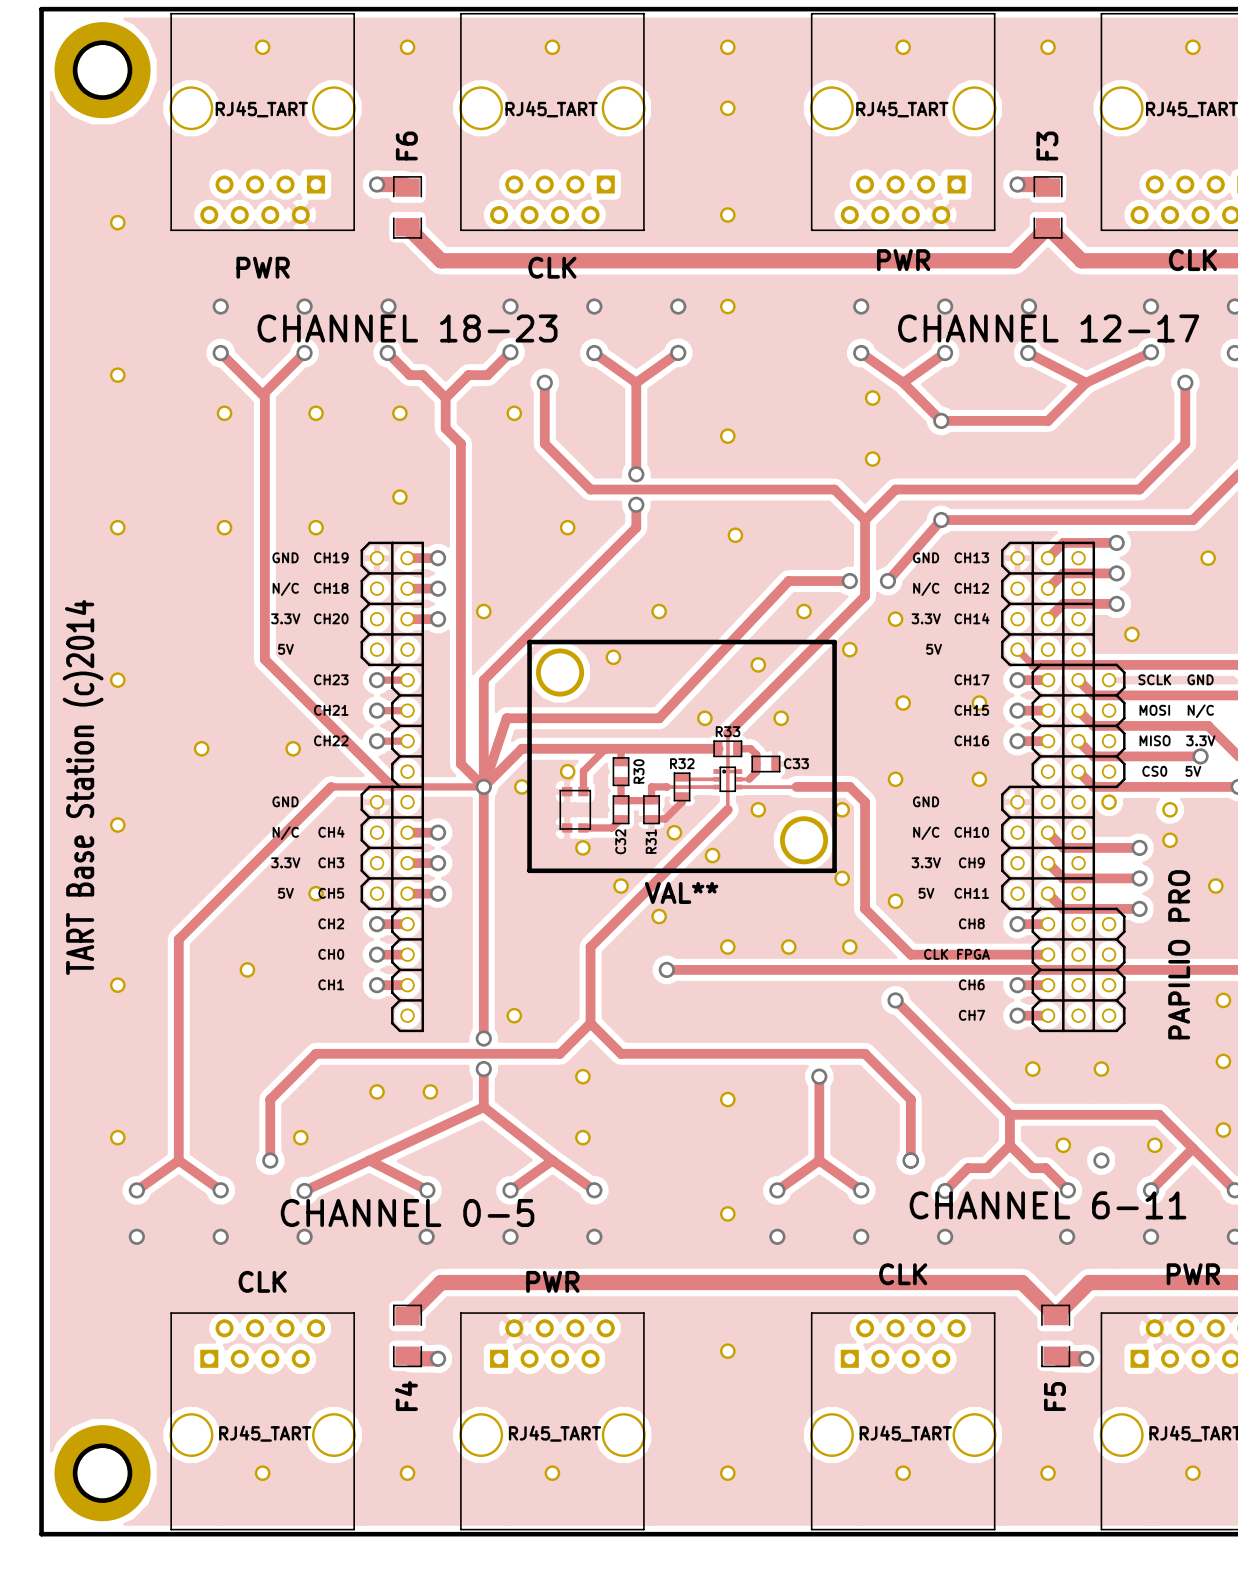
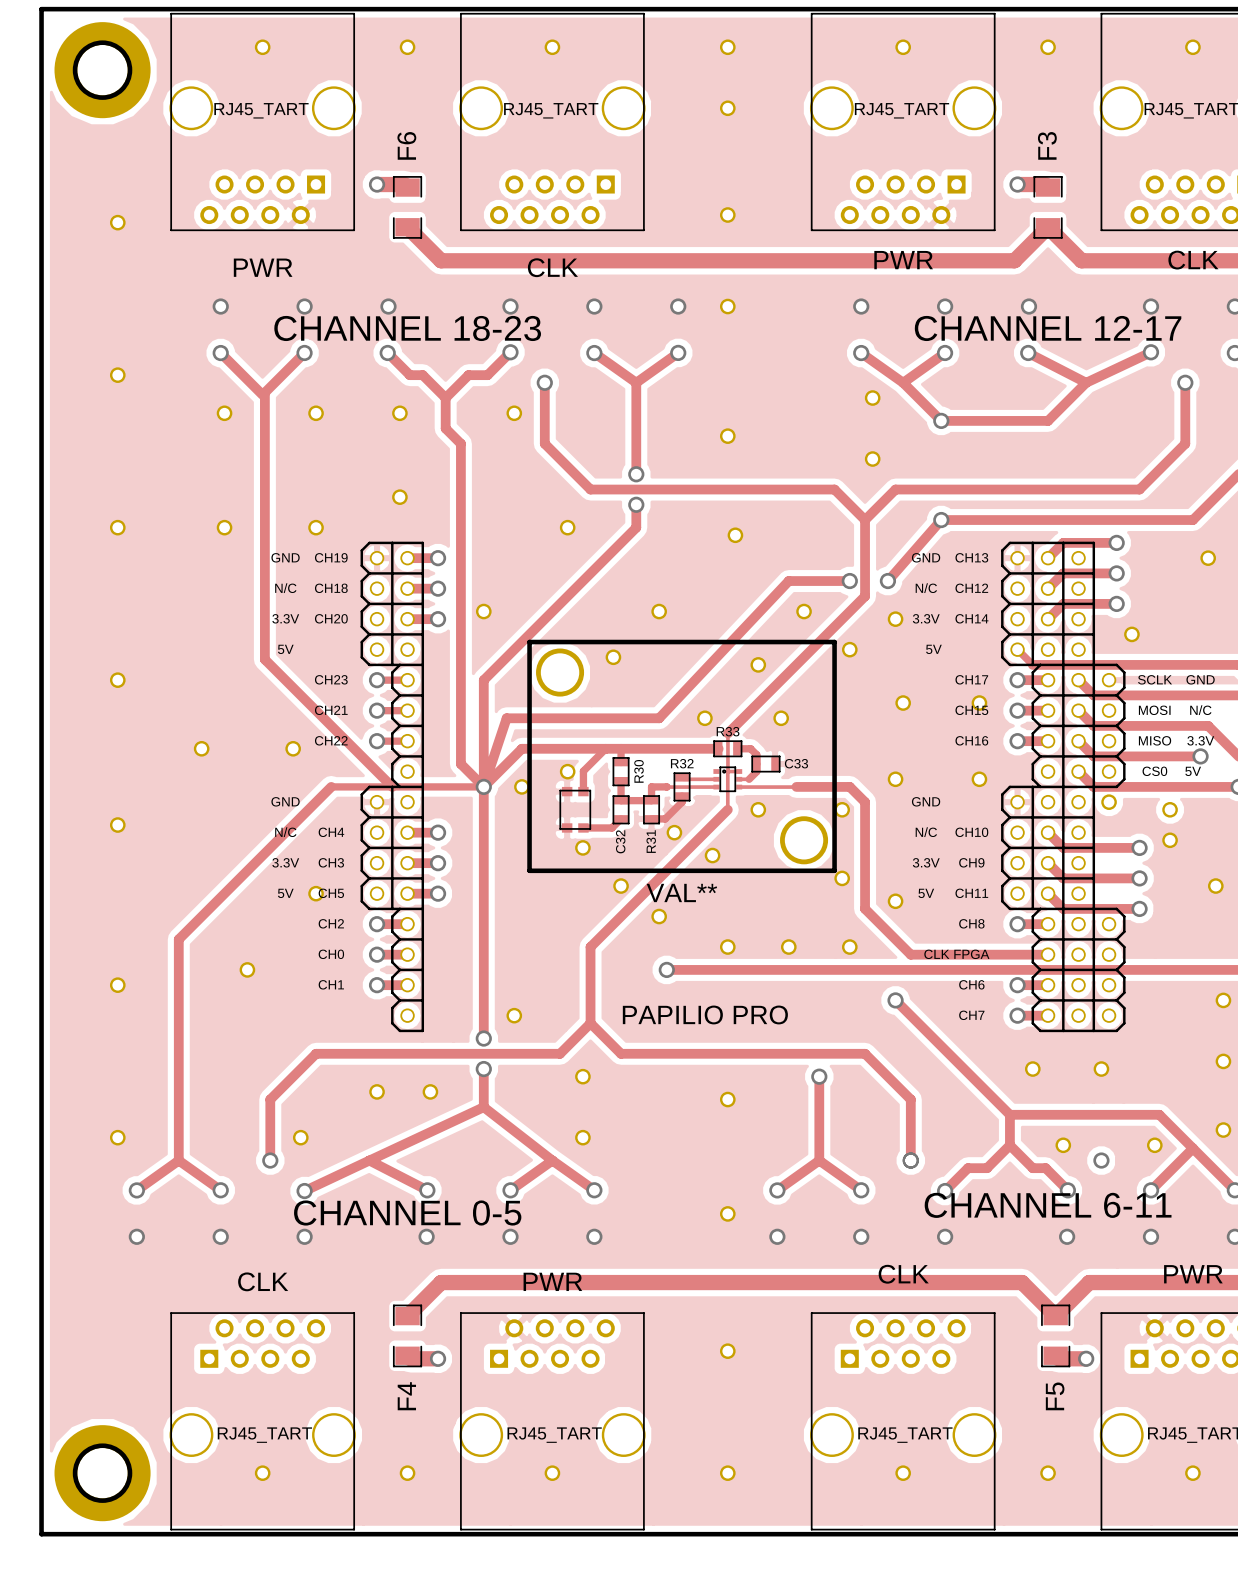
text: TART Base Station (c)2014 (83, 787) -> none
text: PAPILIO PRO (1179, 954) -> none
text: none -> PAPILIO PRO (705, 1014)

